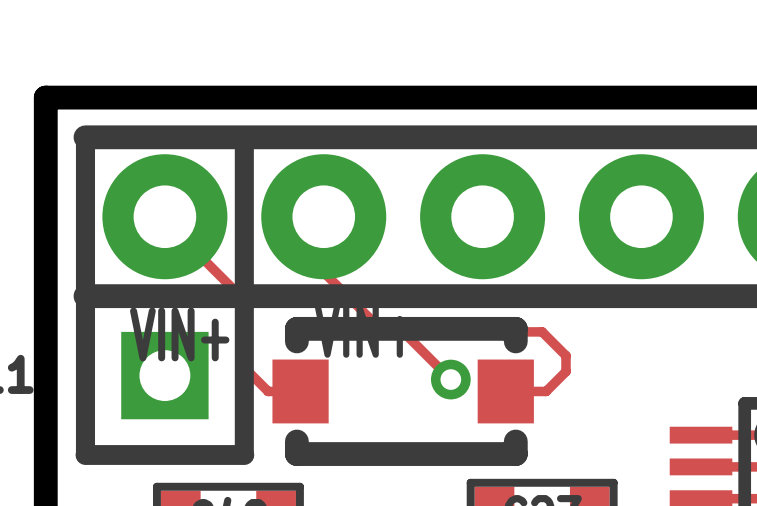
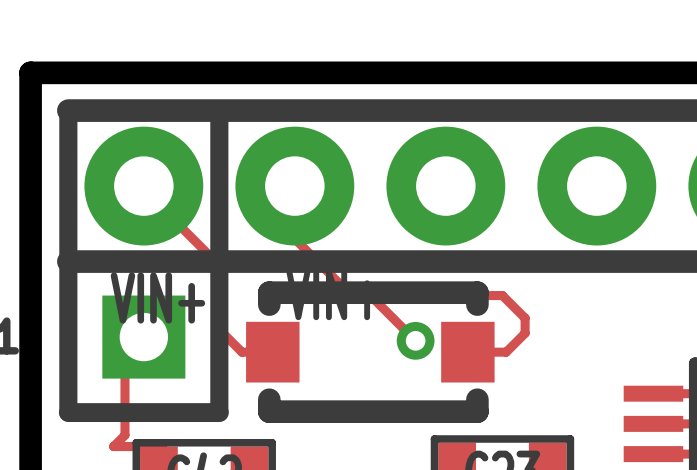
track: none -> (143, 337) (124, 355) (124, 435) (113, 446) (162, 446)

